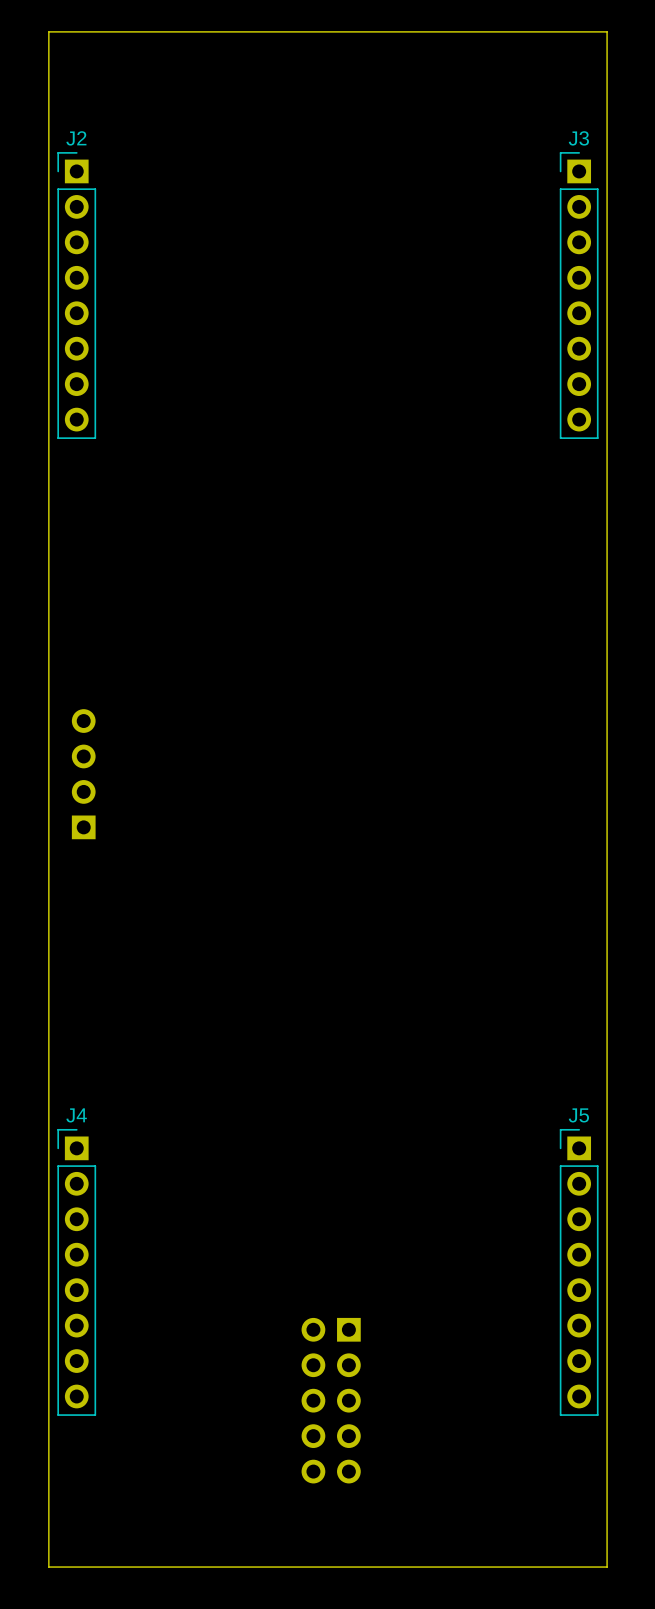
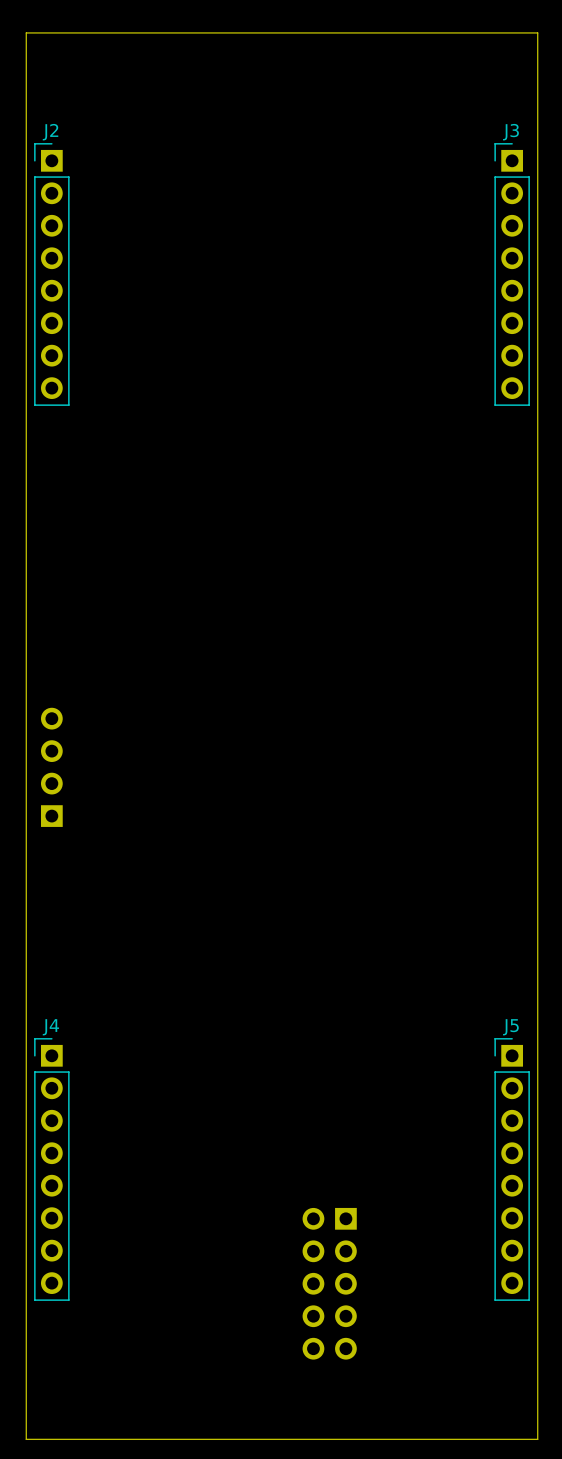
part position: (83, 774) -> (51, 767)
part position: (331, 1400) -> (329, 1283)

